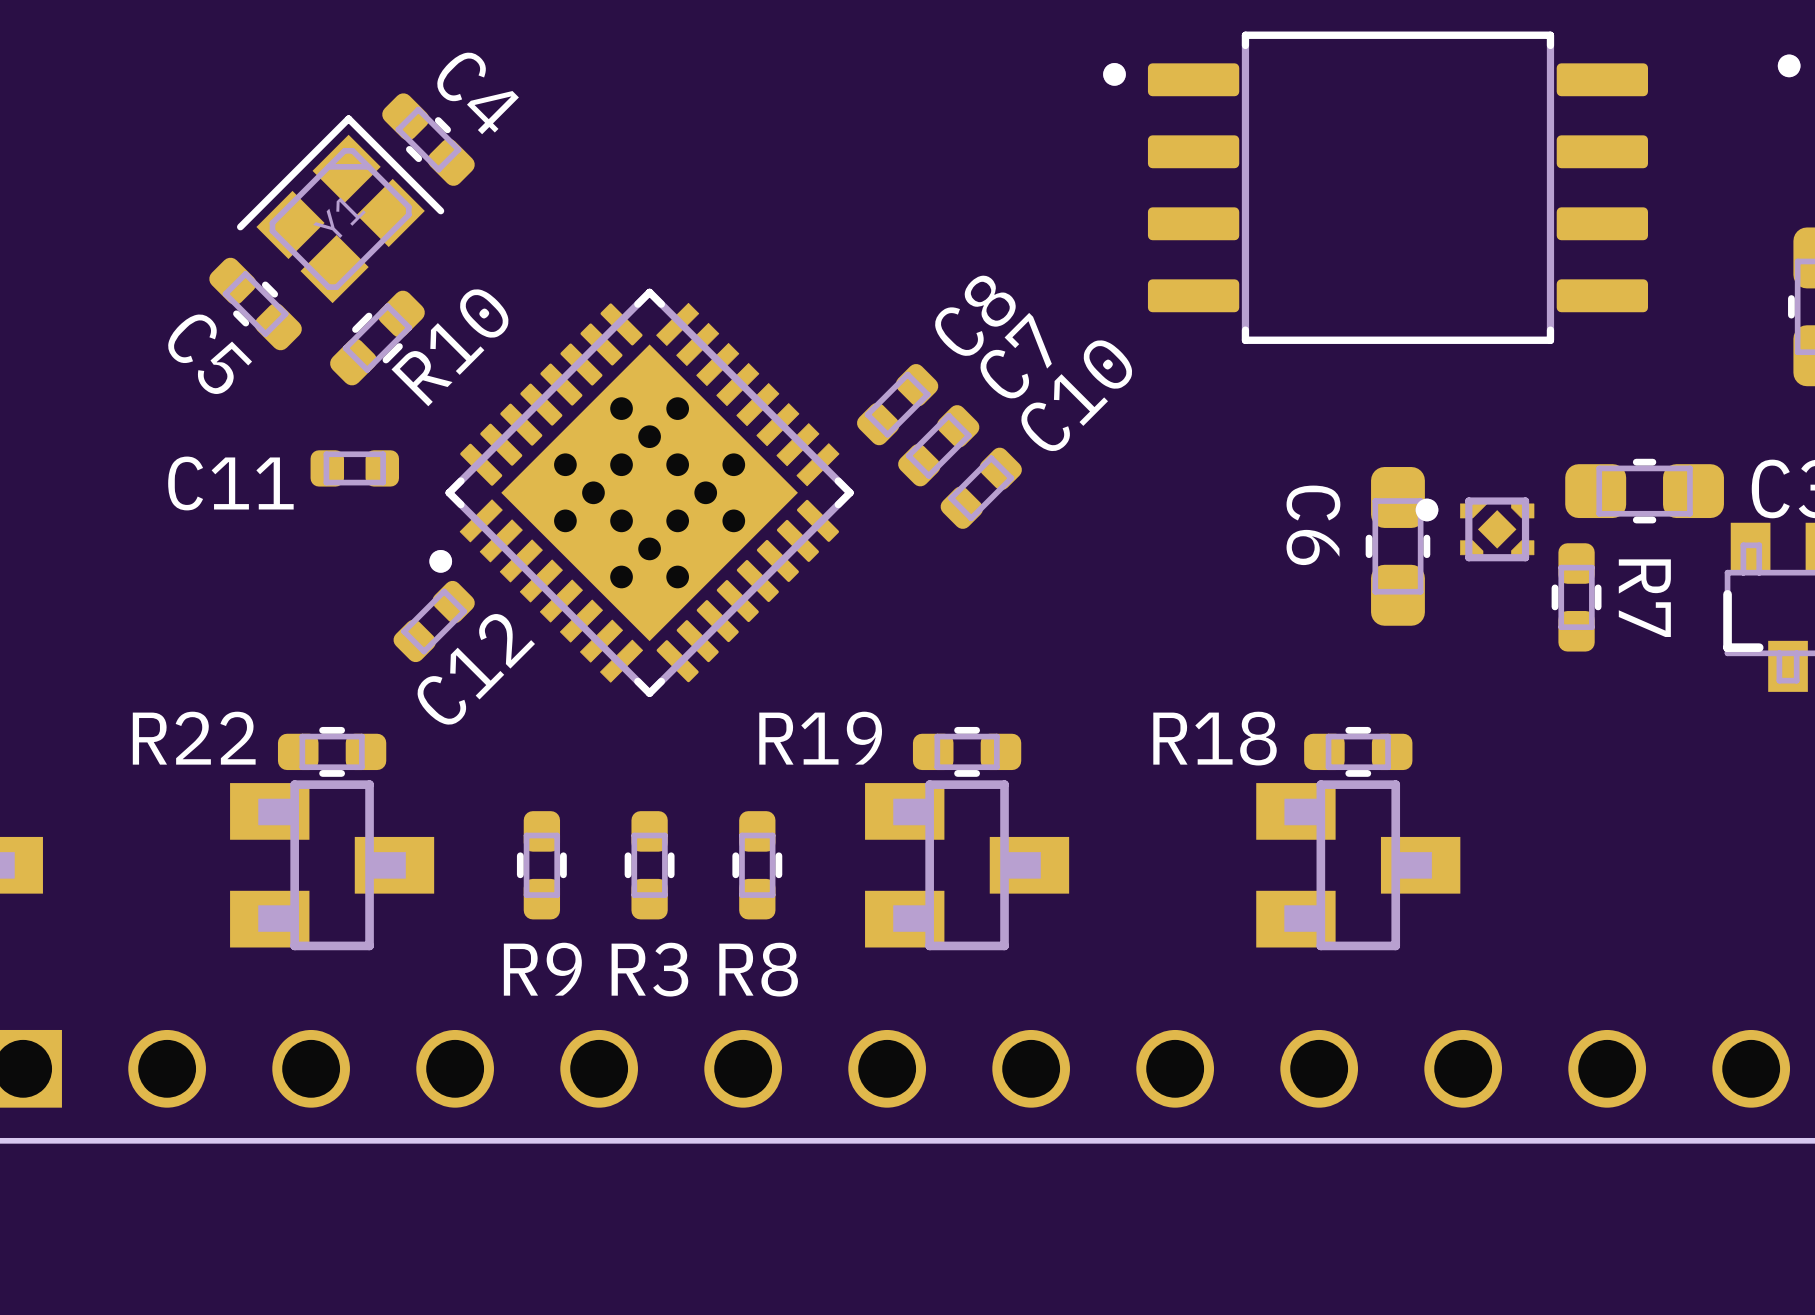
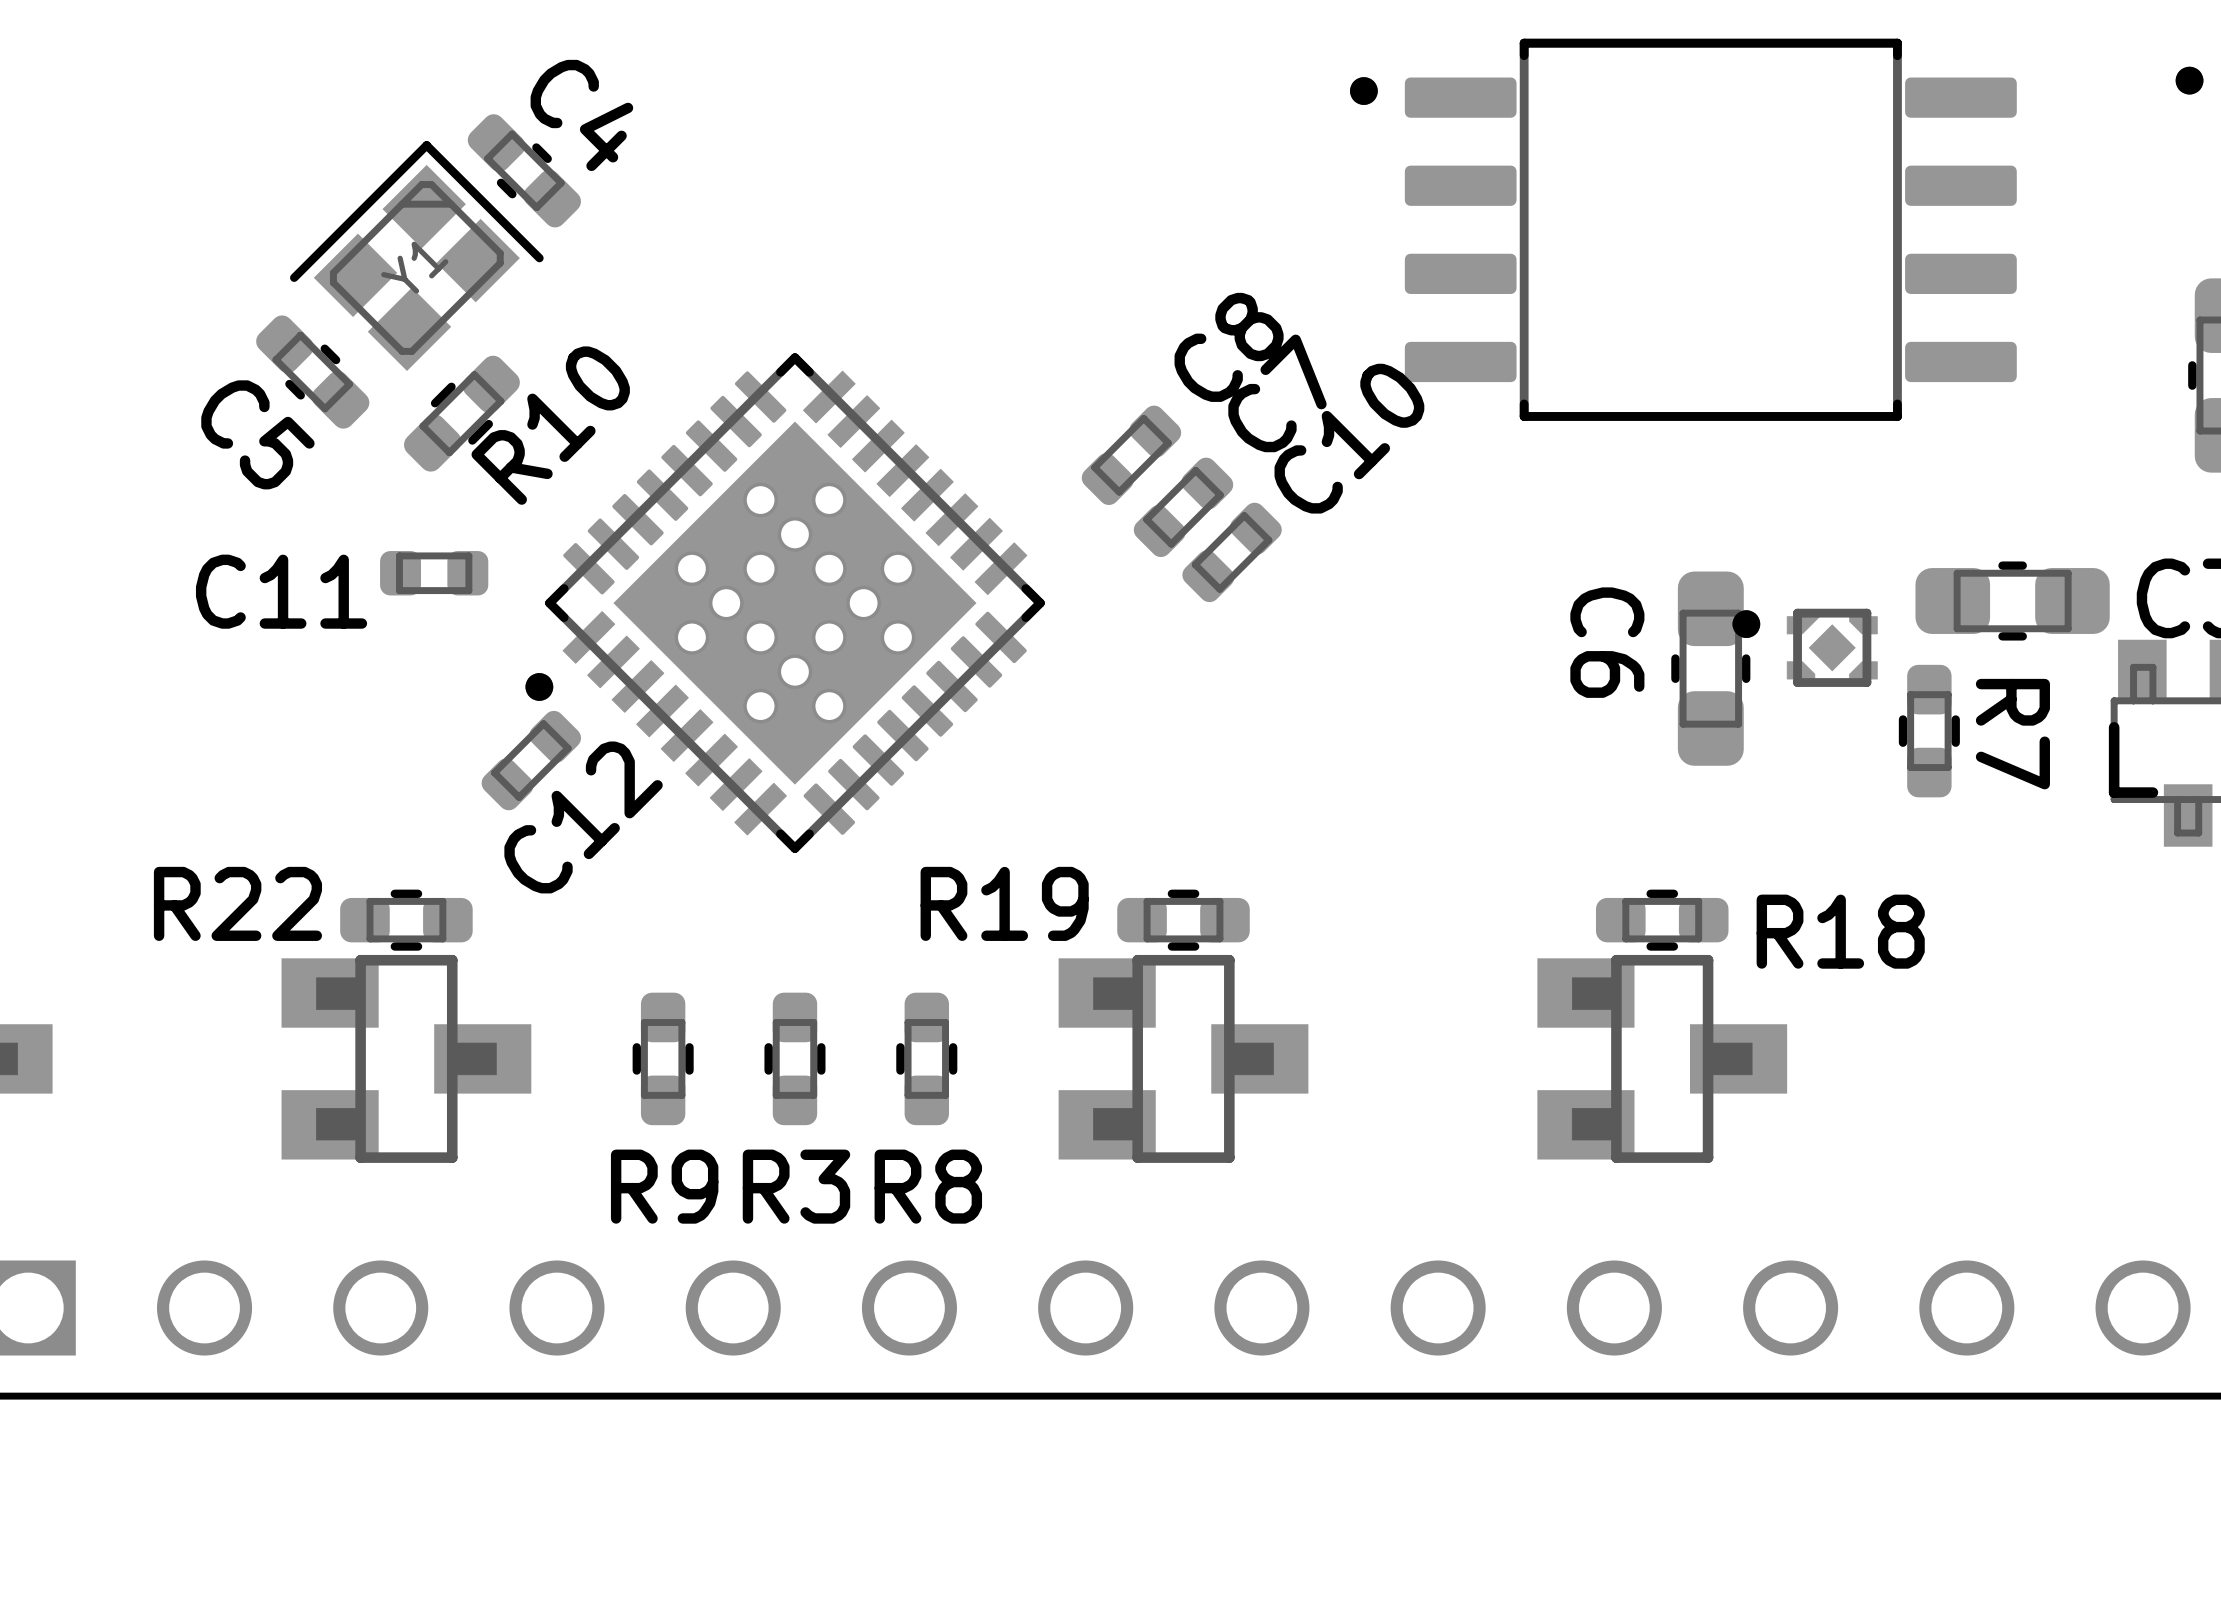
C7 position: (897, 404) -> (1131, 455)
C8 position: (938, 445) -> (1183, 507)
C10 position: (981, 488) -> (1232, 552)
R18 name position: R18 (1215, 738) -> R18 (1840, 931)

